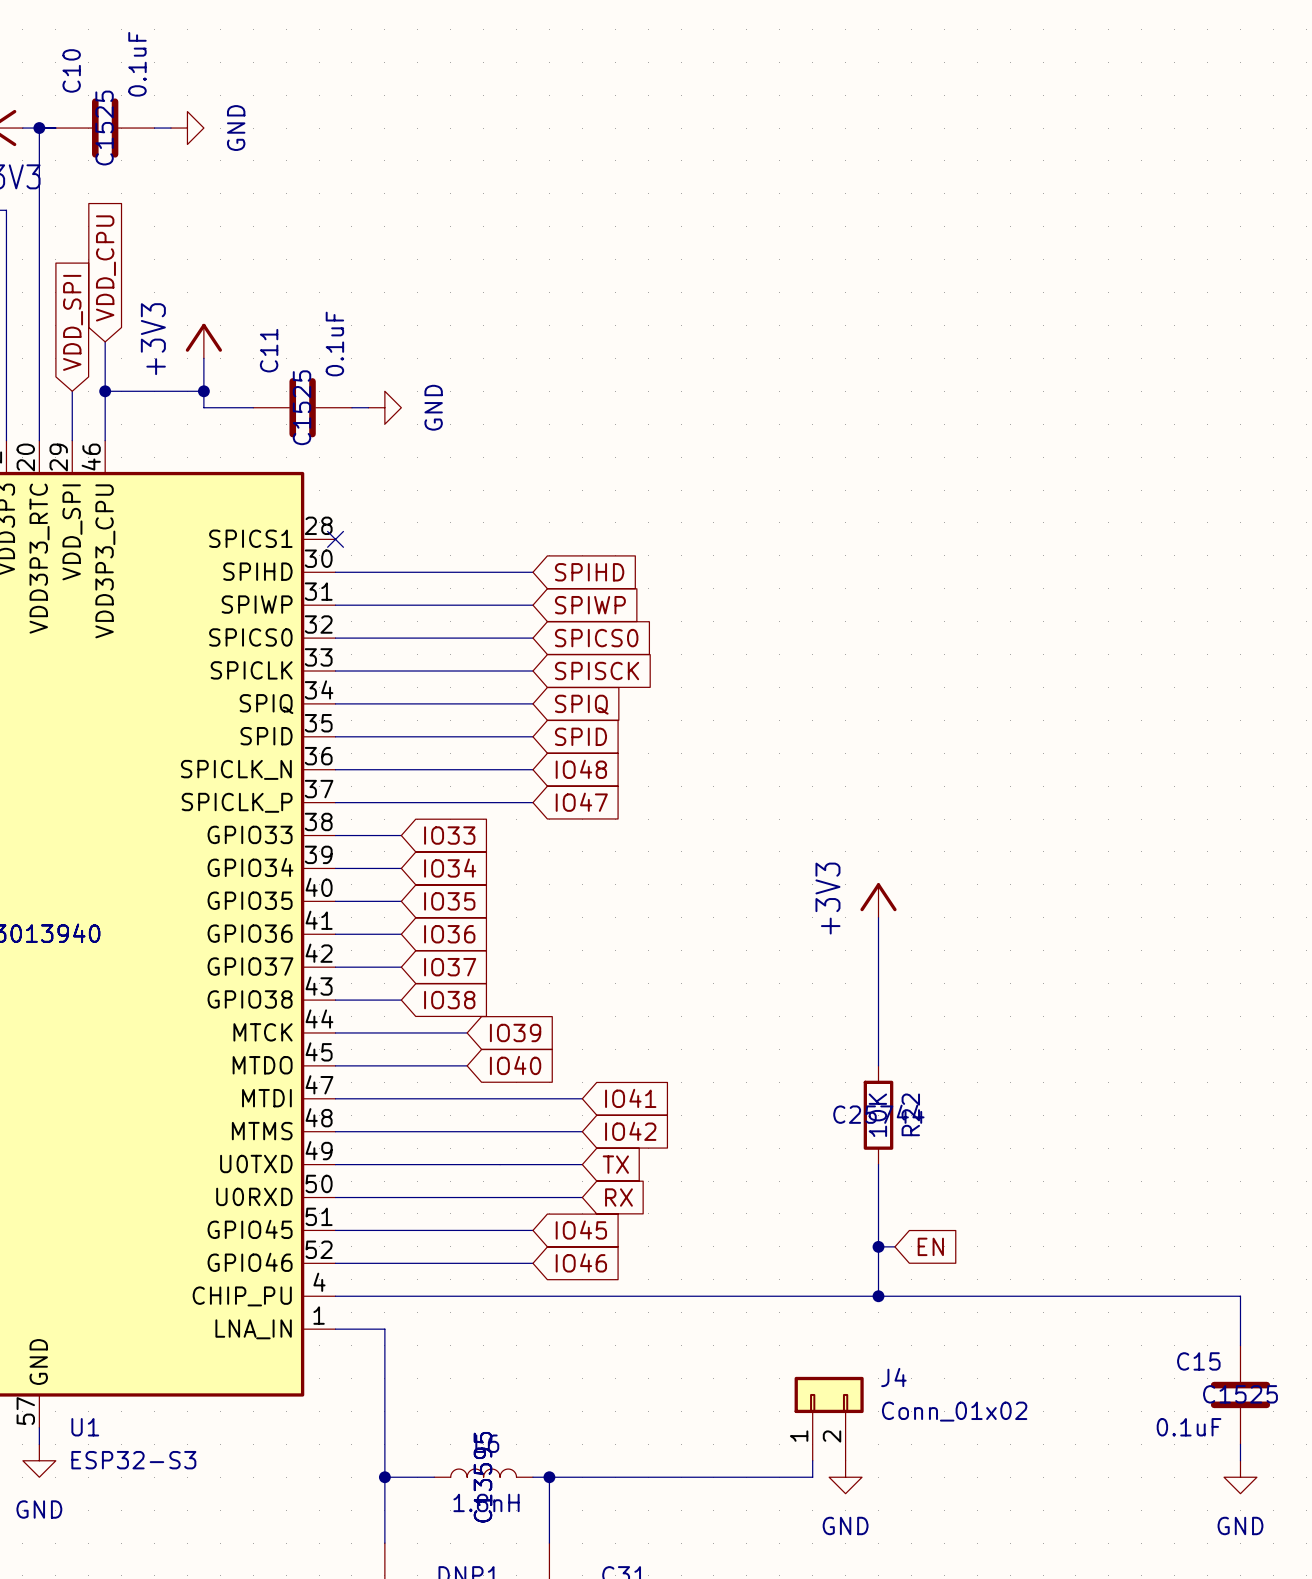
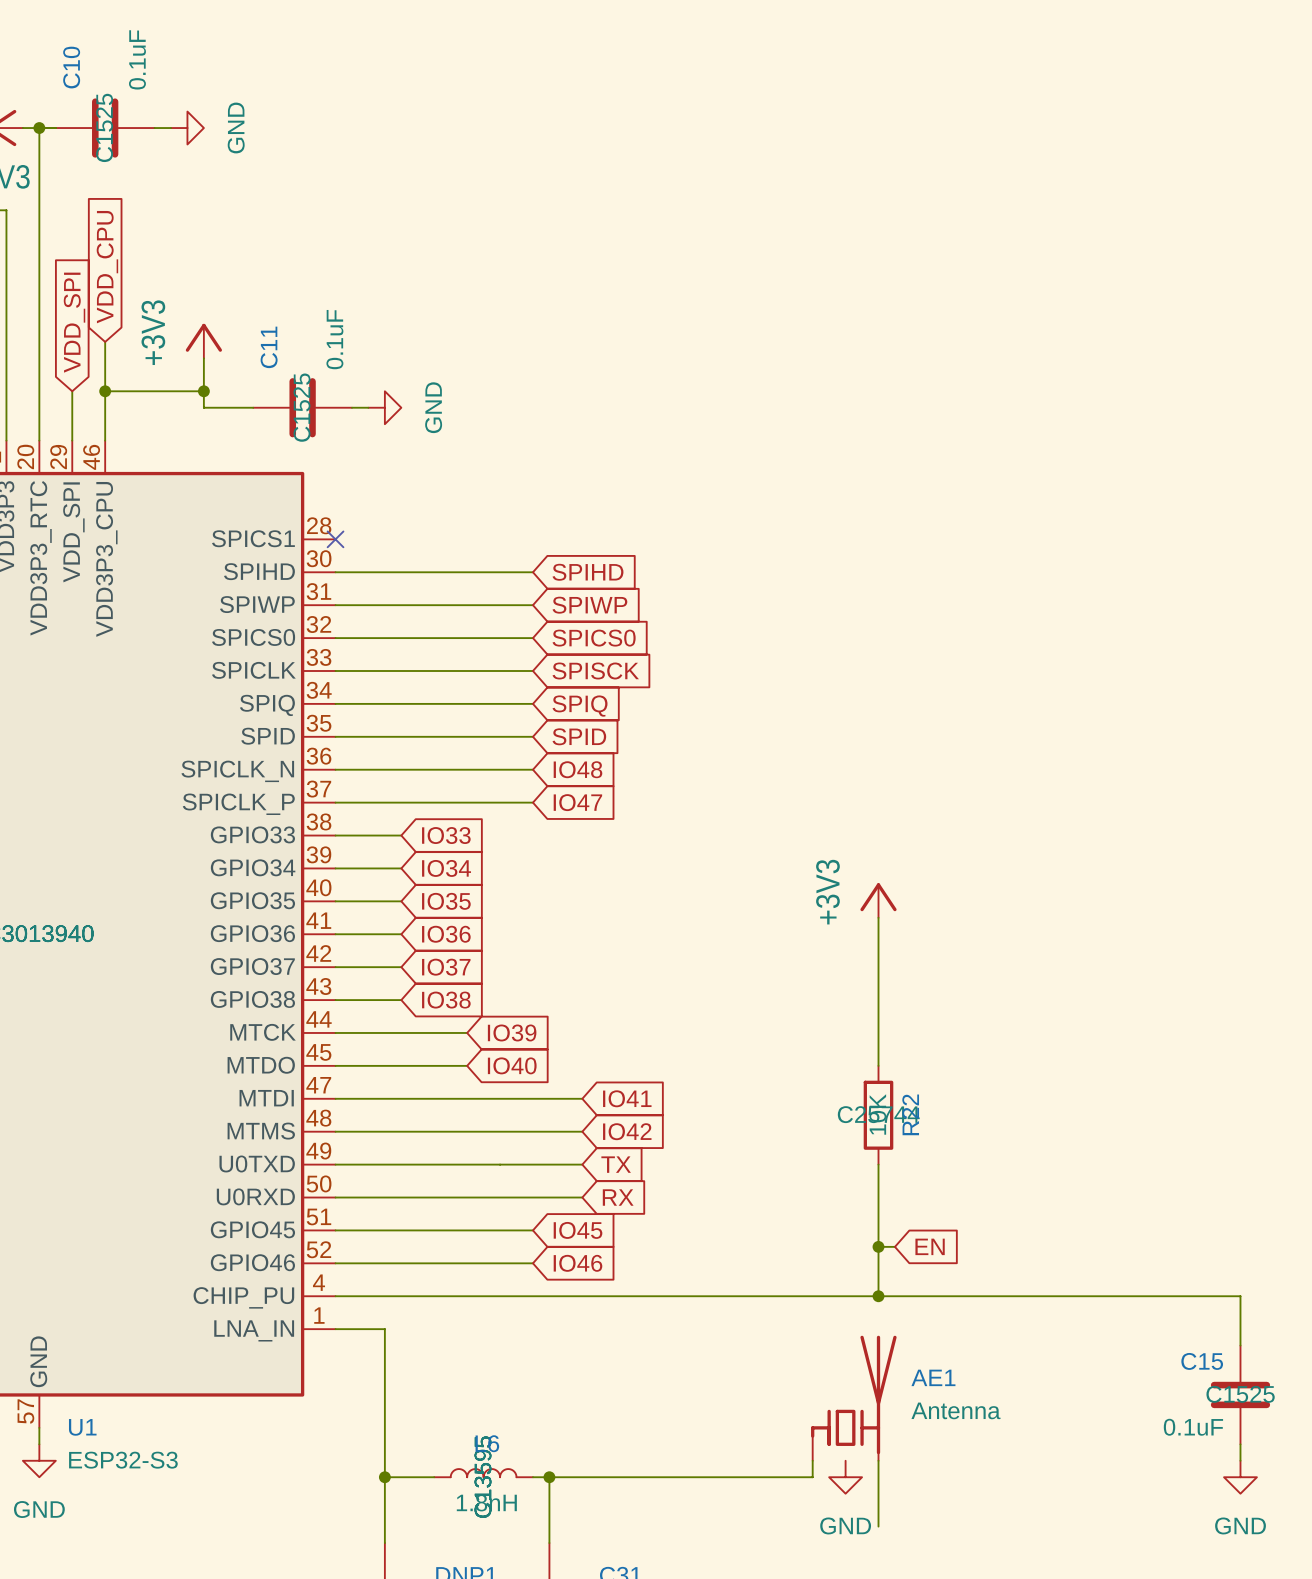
AE1: none -> Antenna (853, 1398)
J4: Conn_01x02 (829, 1418) -> none
wire: none -> (878, 1460) (878, 1526)

